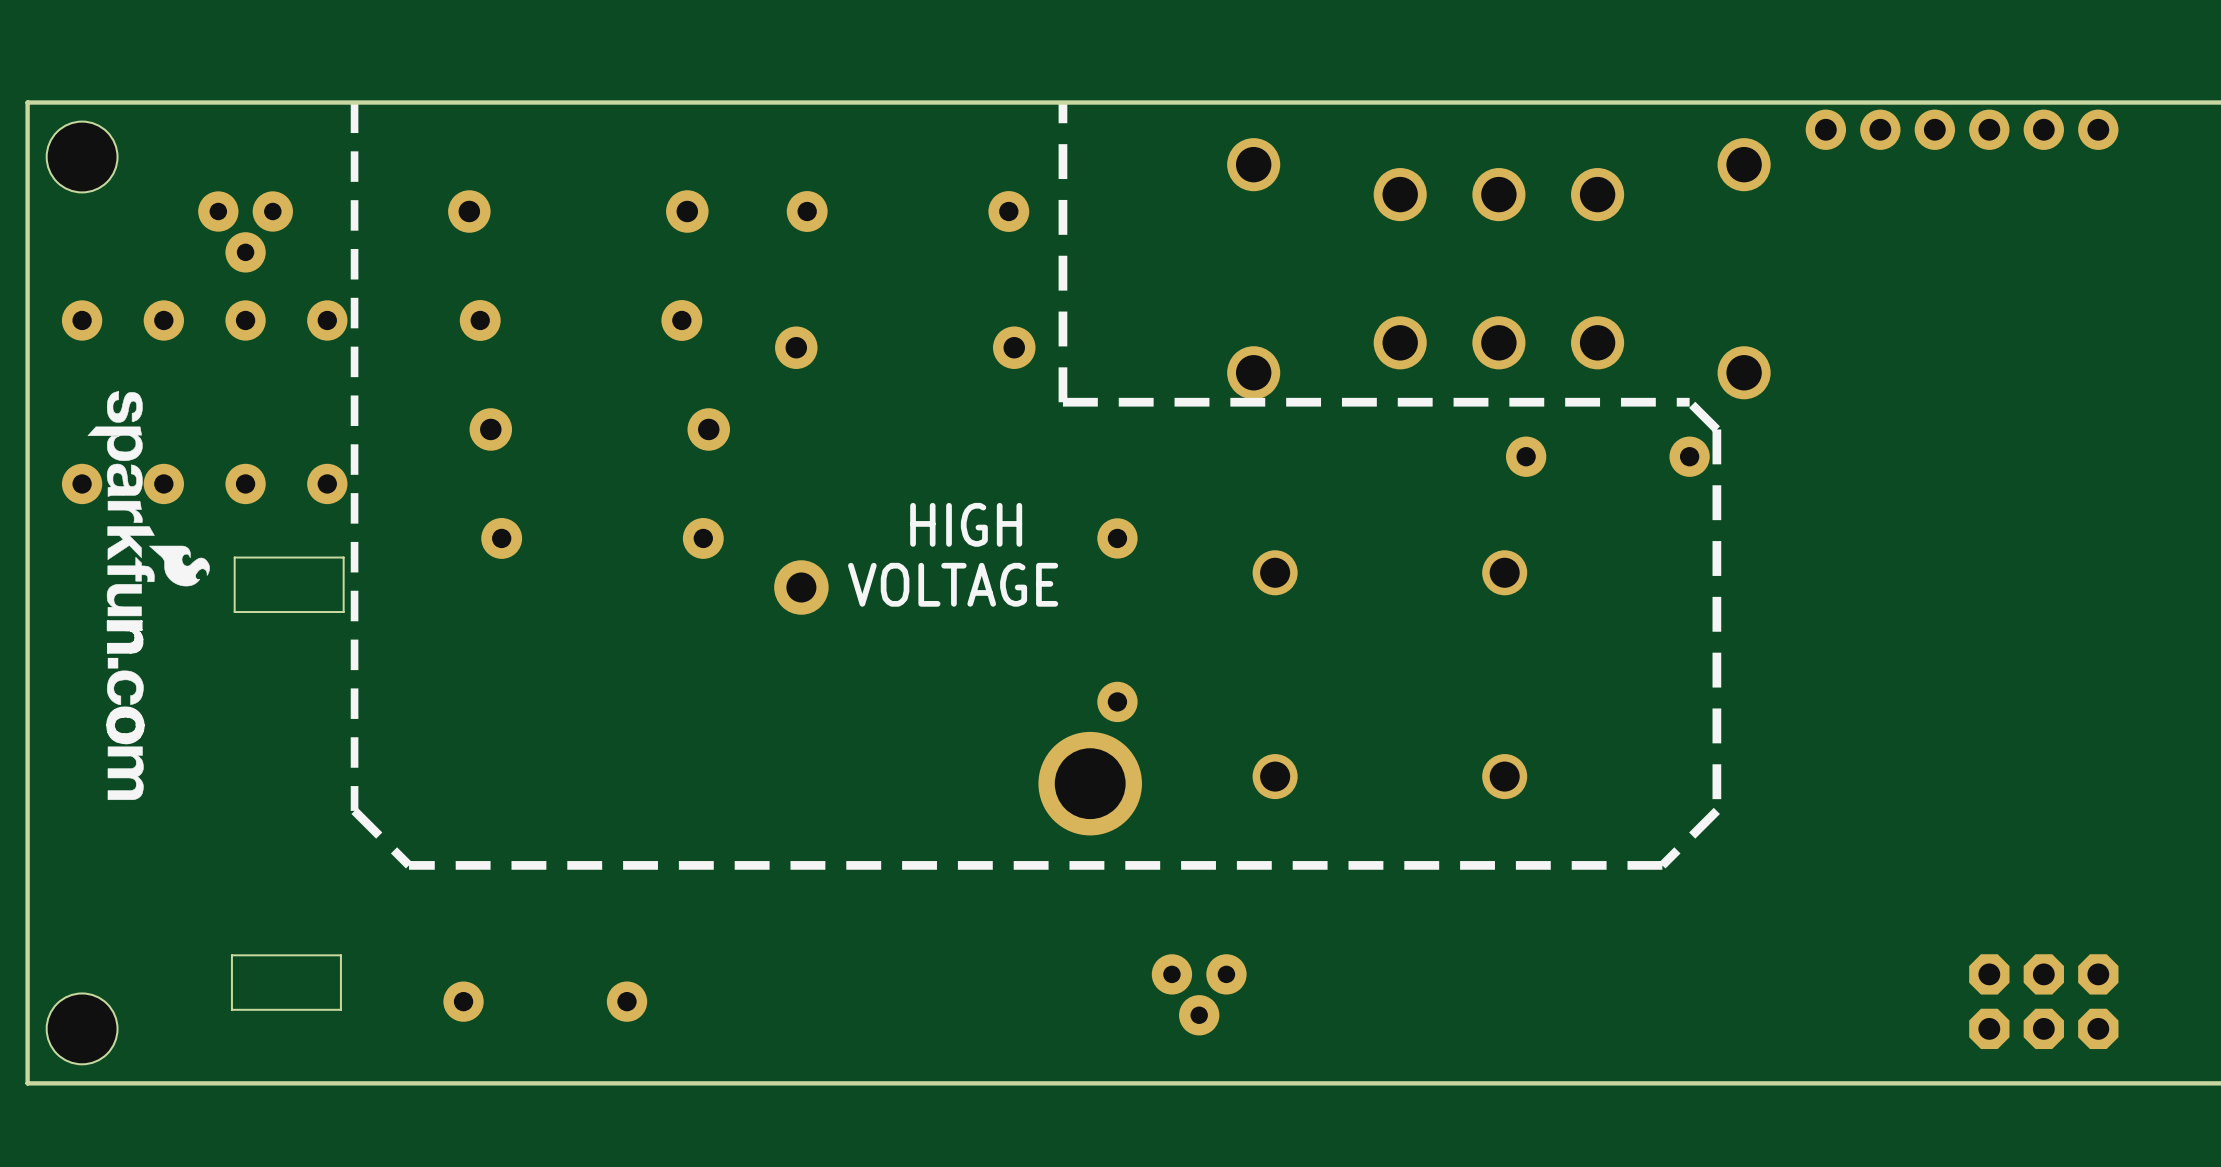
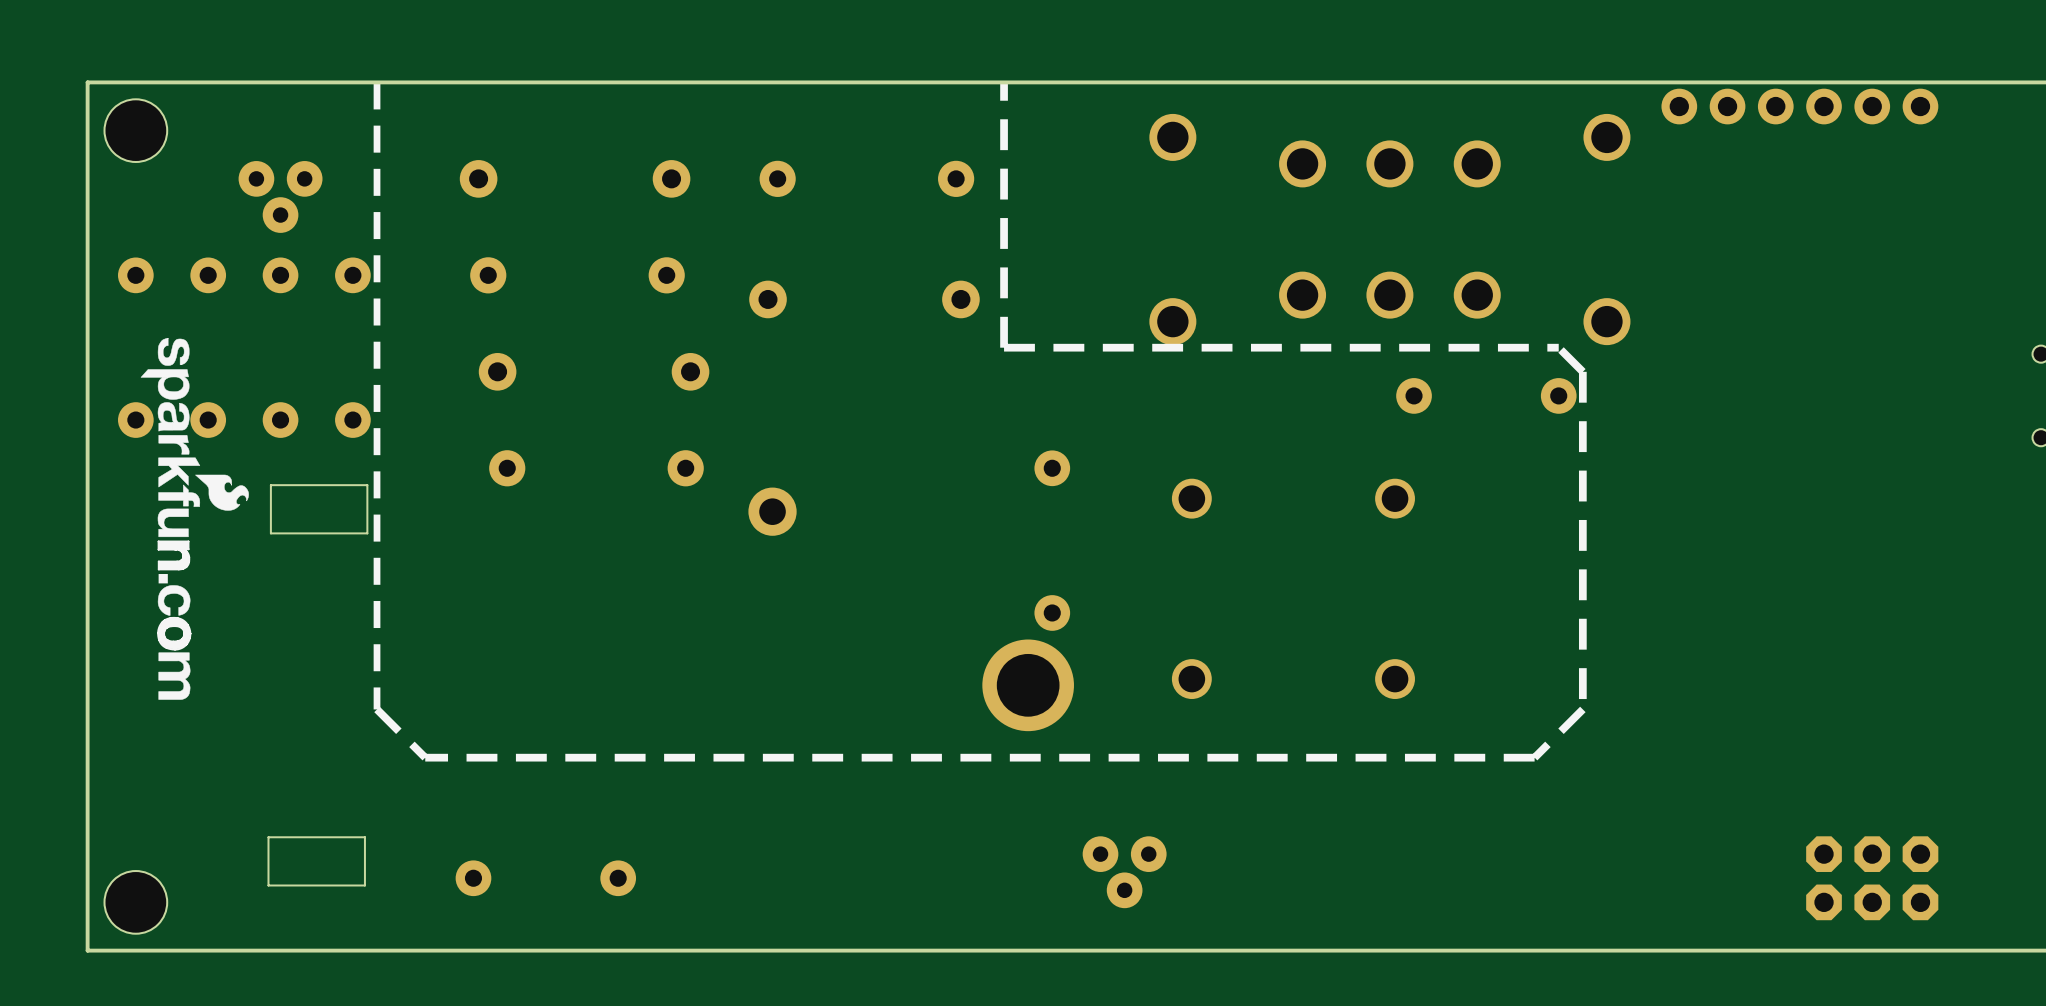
text: HIGH (966, 524) -> none
text: VOLTAGE (953, 584) -> none

